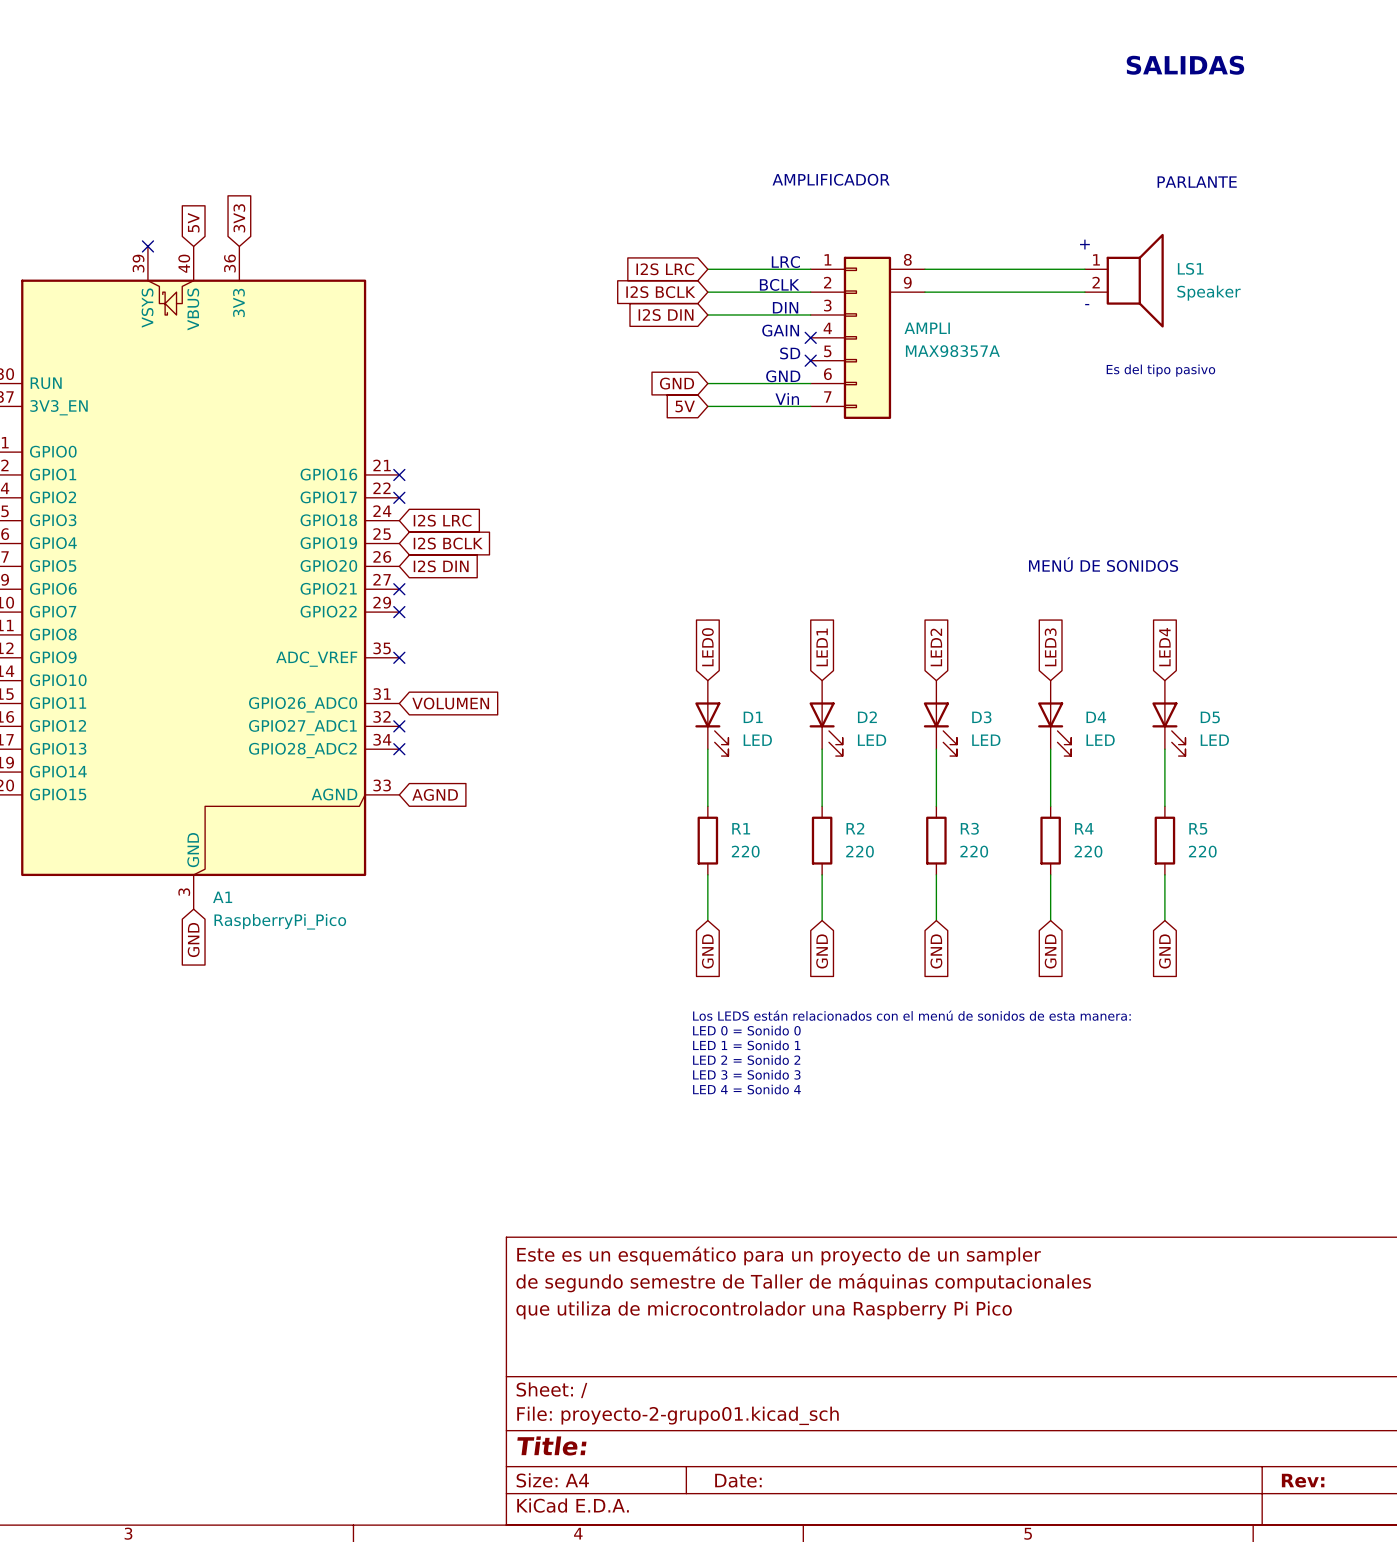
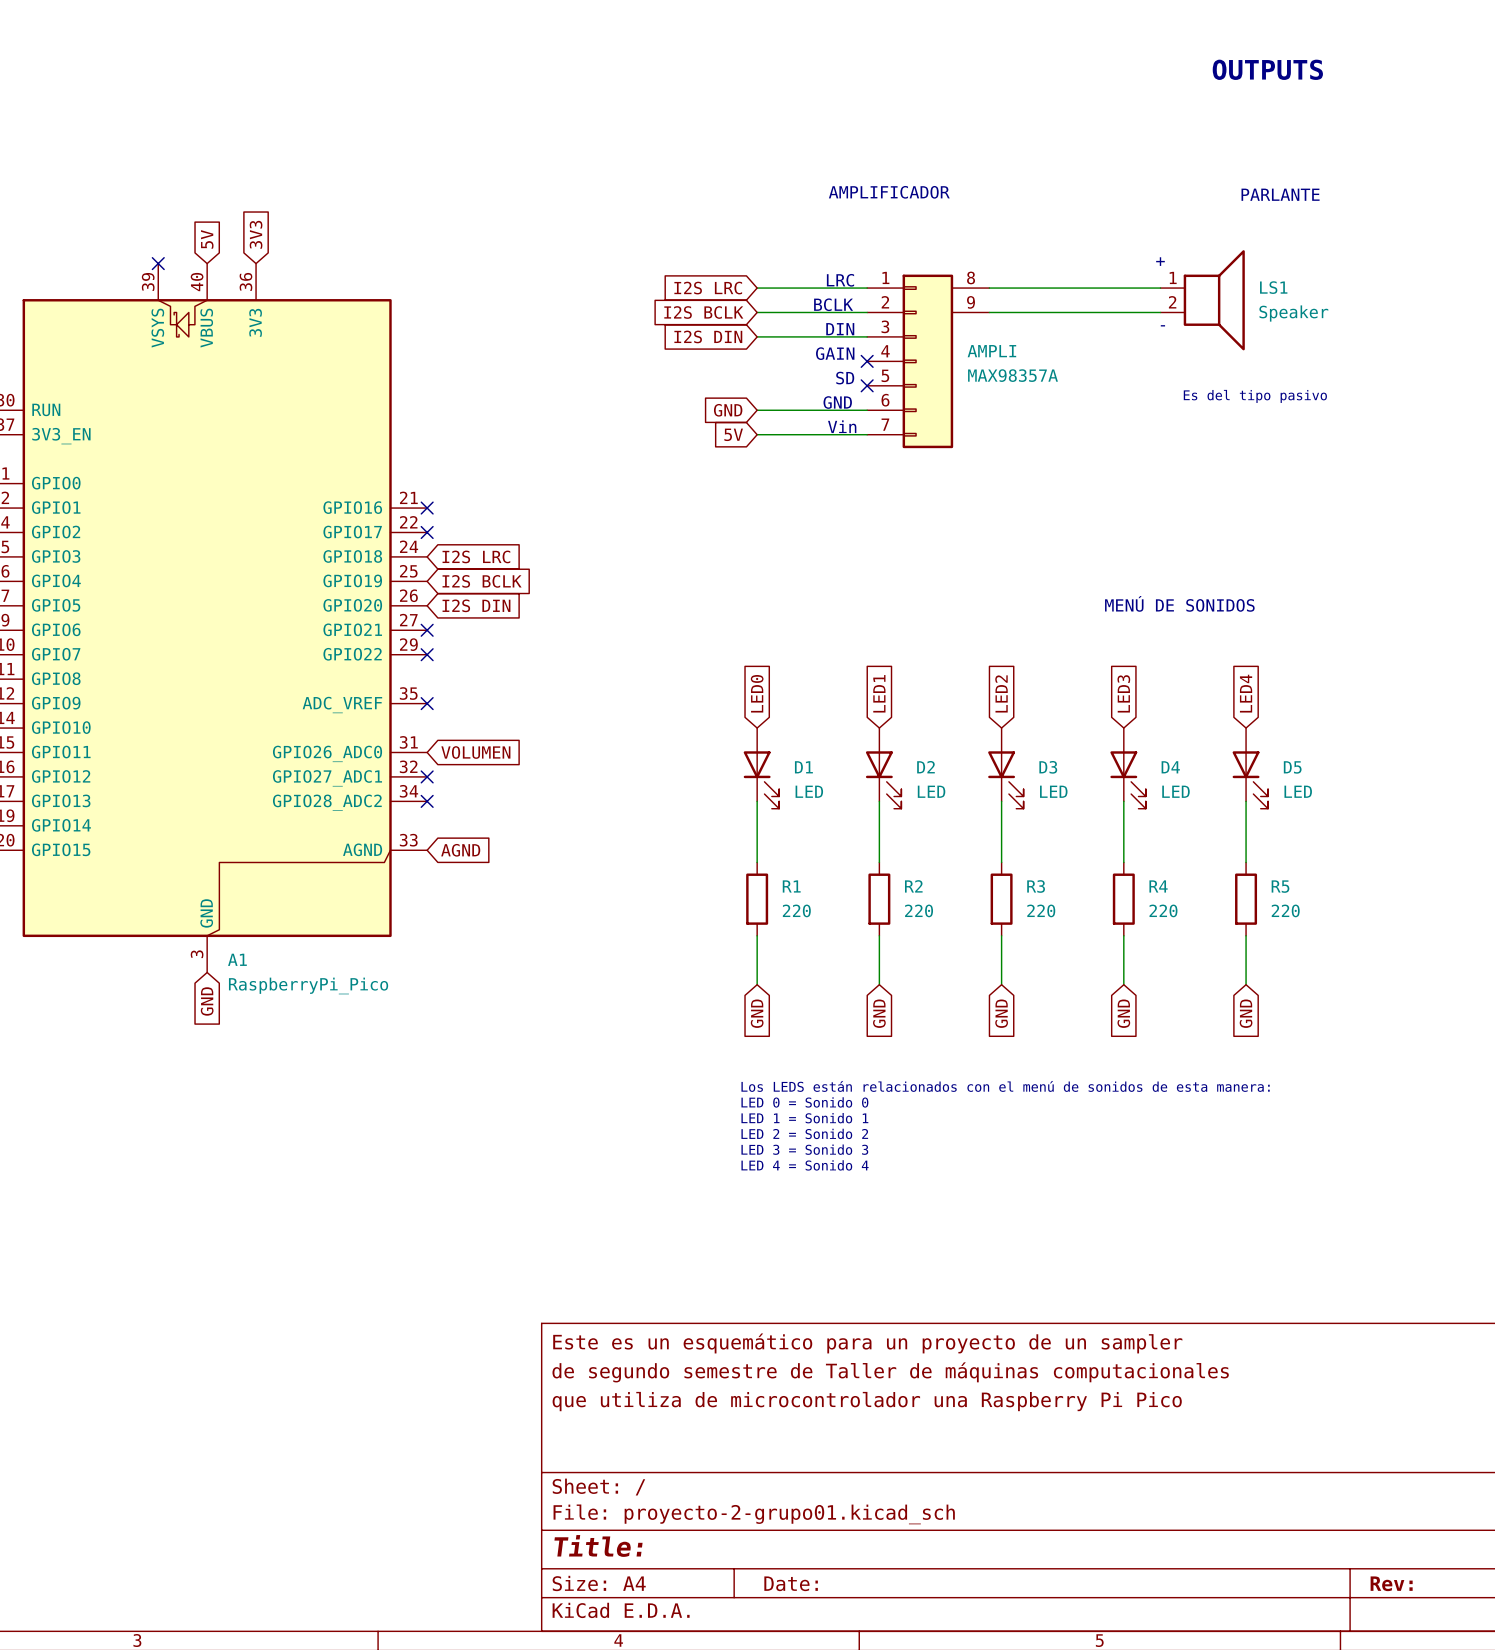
text: SALIDAS (1185, 65) -> OUTPUTS (1267, 69)

